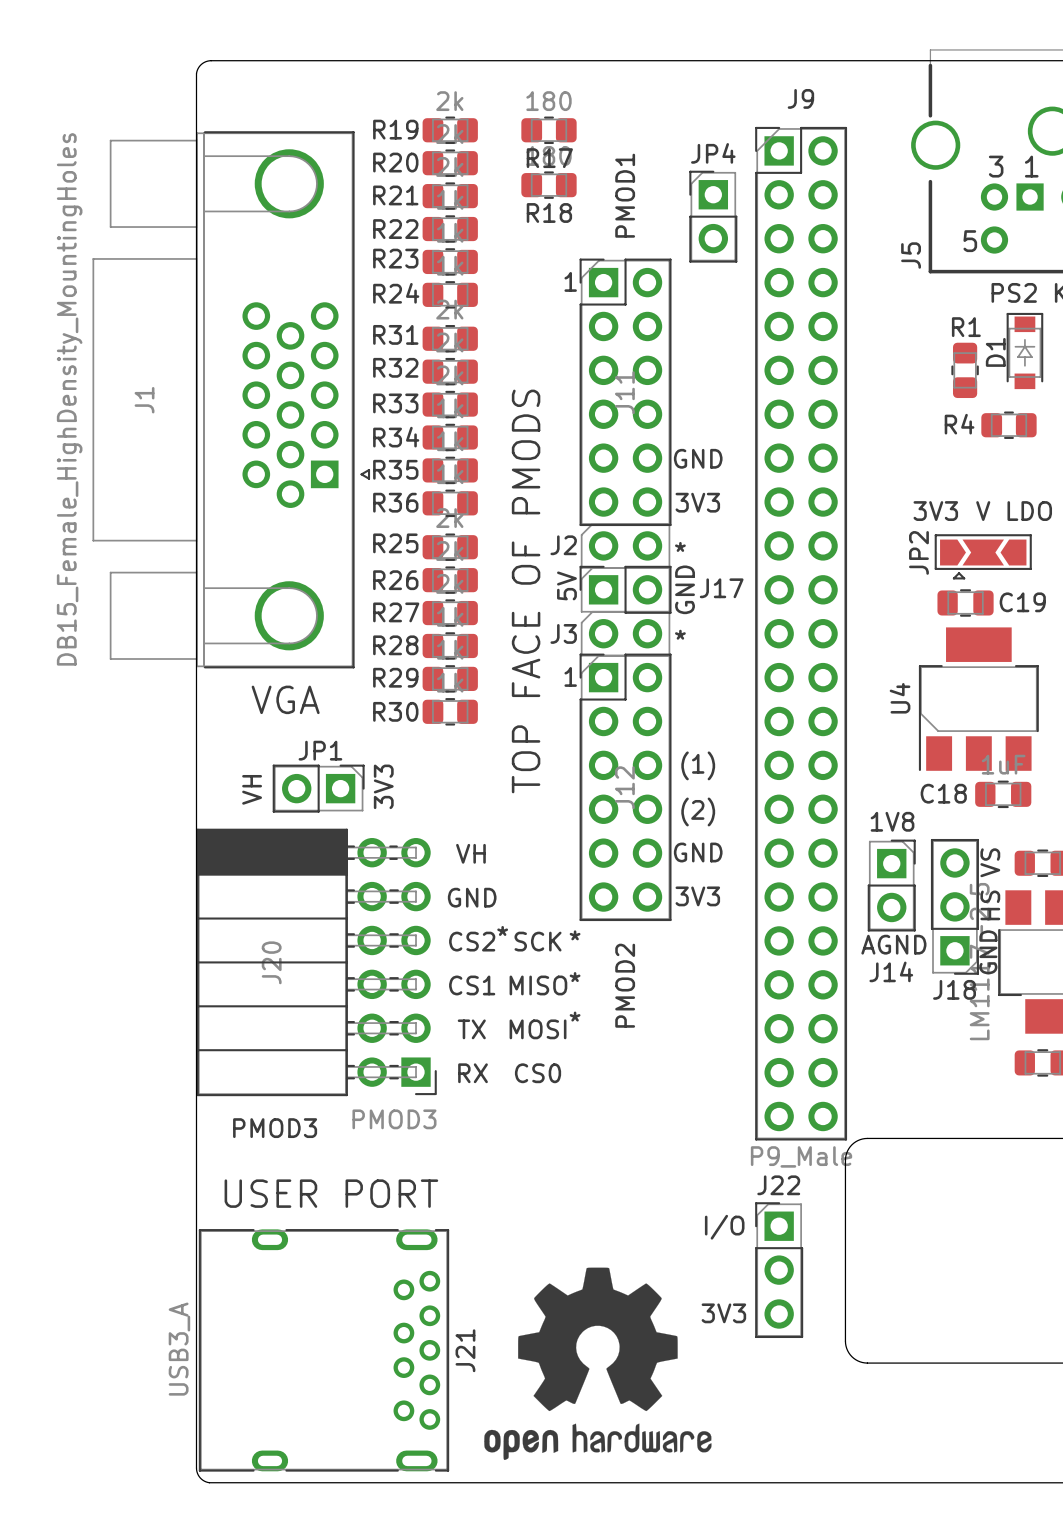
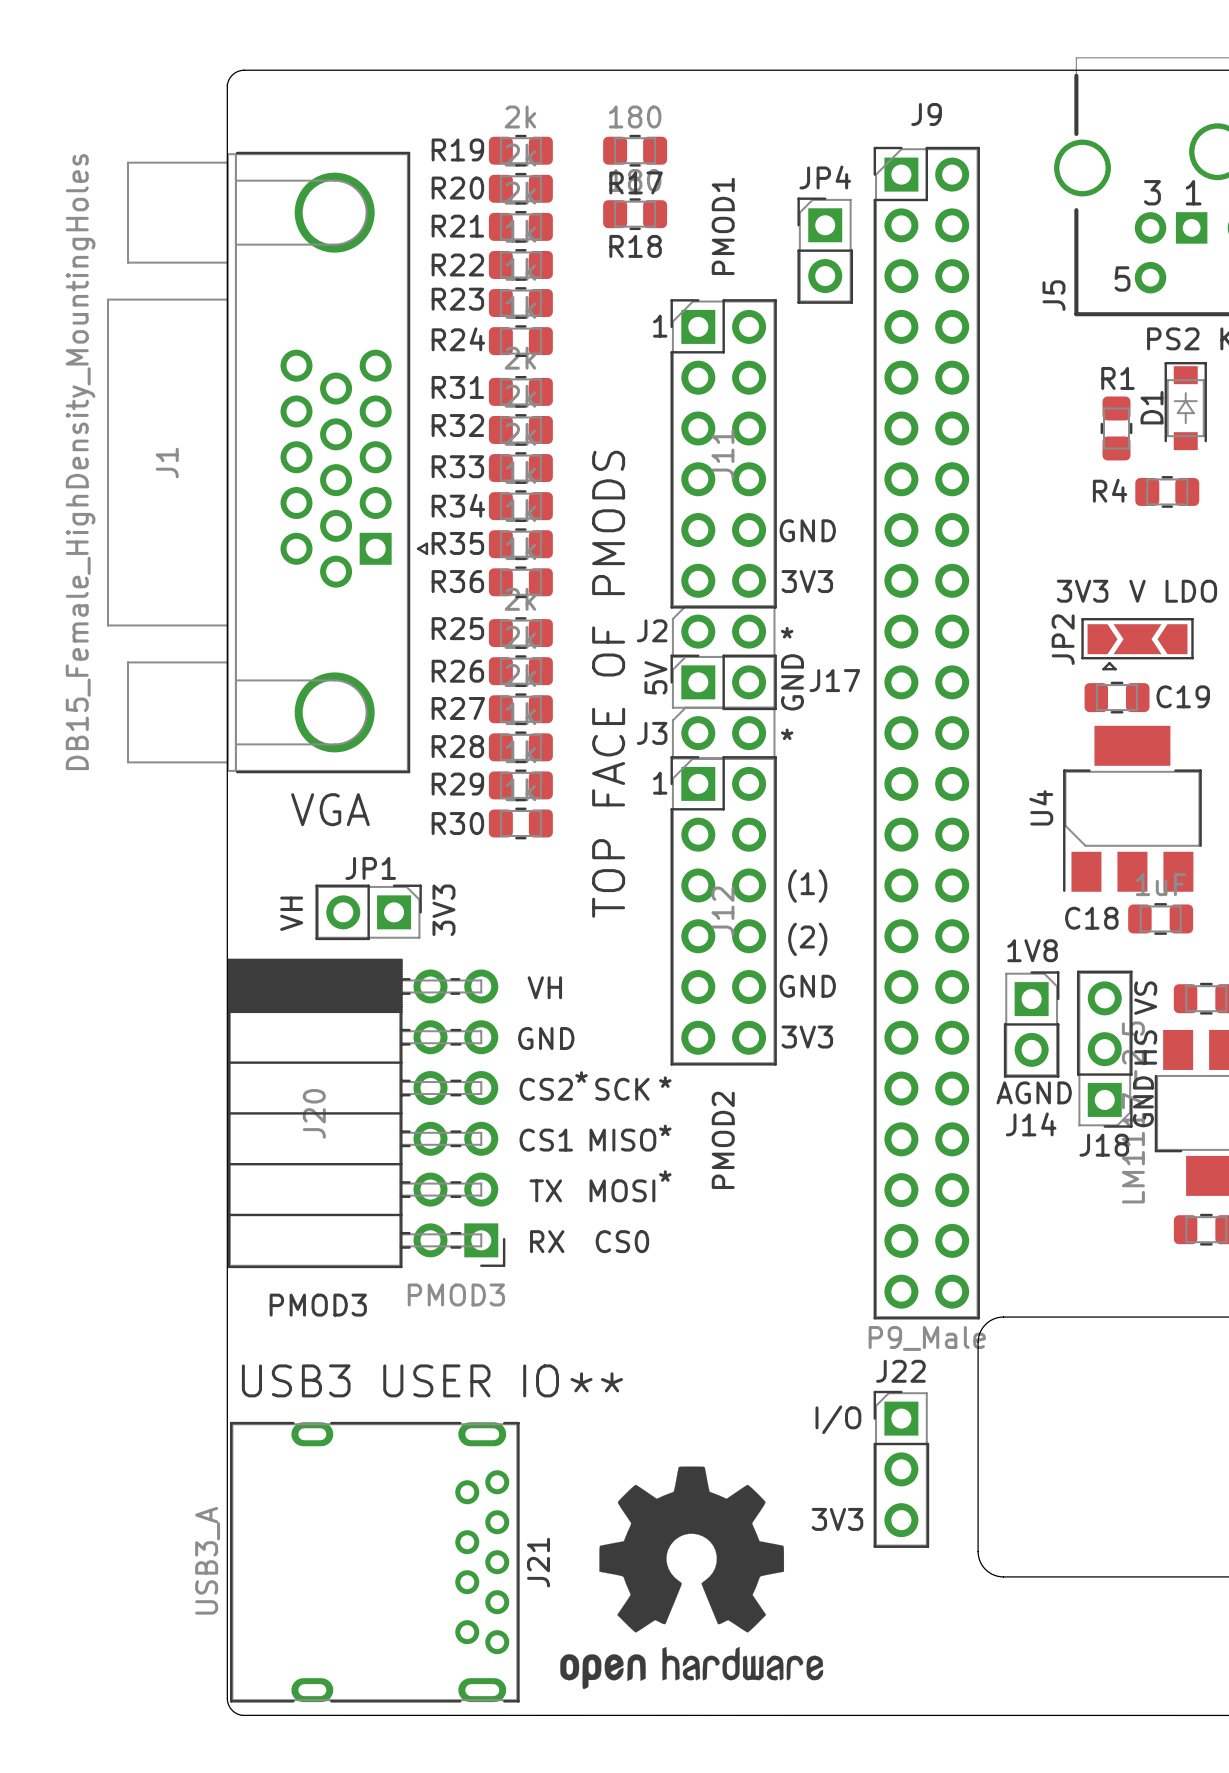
text: USER PORT (331, 1193) -> USB3 USER IO (400, 1380)
text: none -> ** (596, 1382)

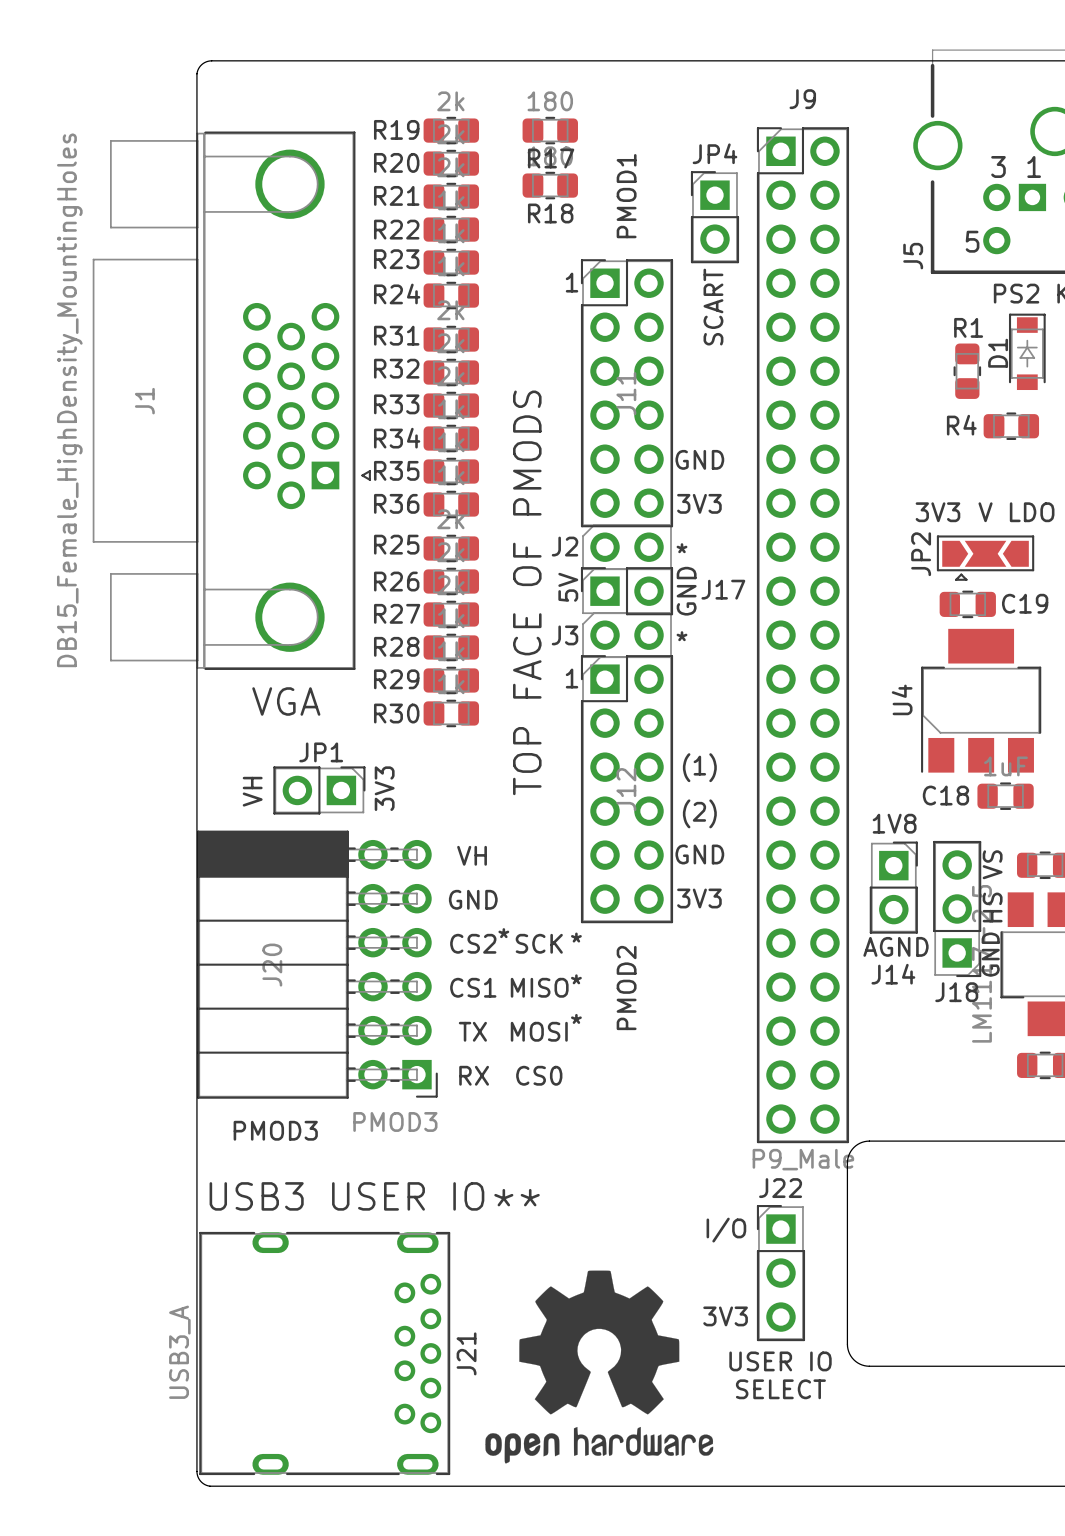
text: none -> SCART (713, 307)
text: none -> USER IO (780, 1361)
text: none -> SELECT (780, 1389)

